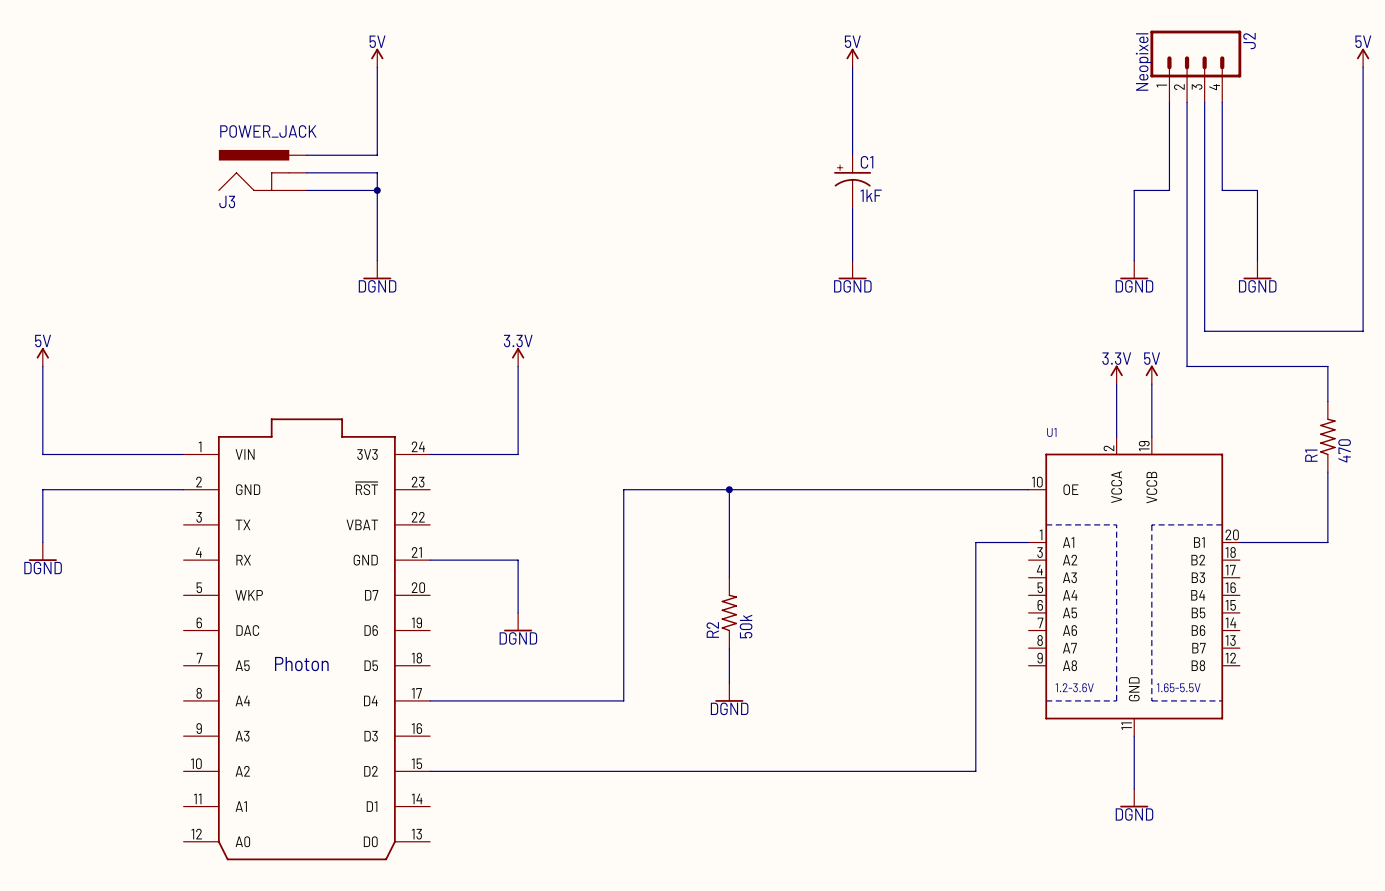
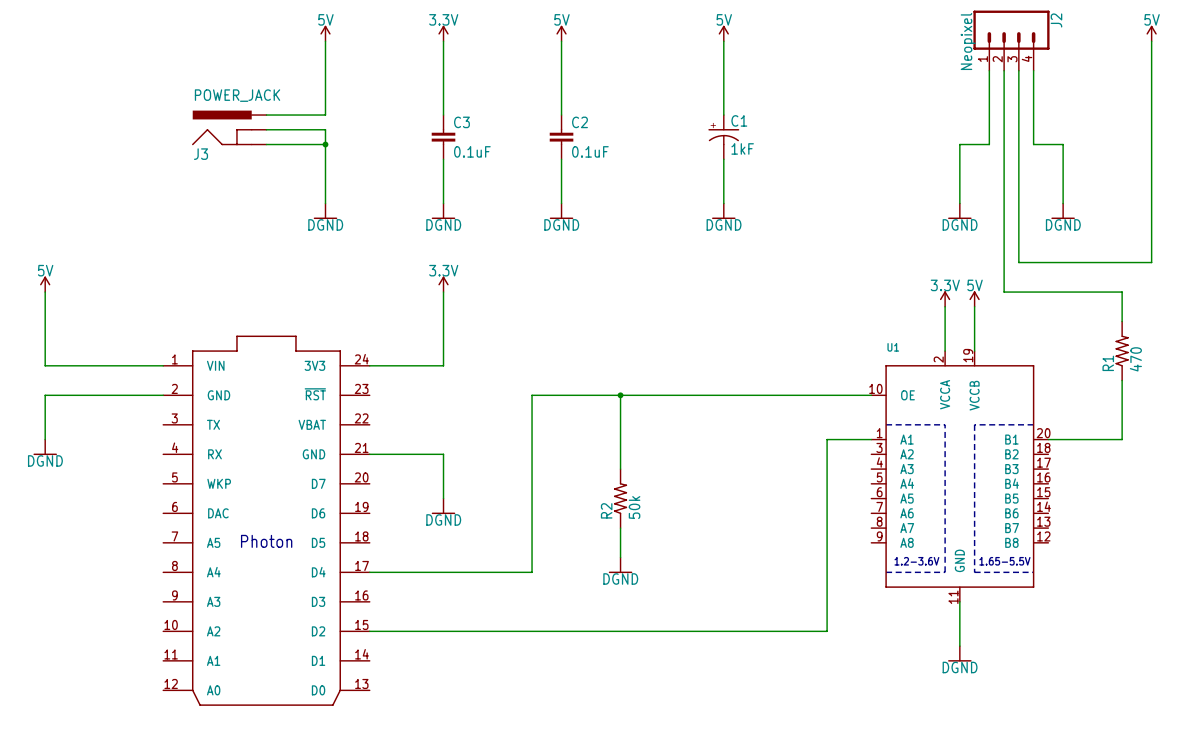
power symbol: none -> 3.3V (443, 33)
power symbol: none -> 5V (561, 33)
wire: none -> (443, 41) (443, 115)
wire: none -> (561, 41) (561, 115)
C3: none -> 0.1uF (443, 137)
C2: none -> 0.1uF (561, 137)
wire: none -> (443, 159) (443, 203)
wire: none -> (561, 159) (561, 203)
power symbol: none -> DGND (443, 211)
power symbol: none -> DGND (561, 211)

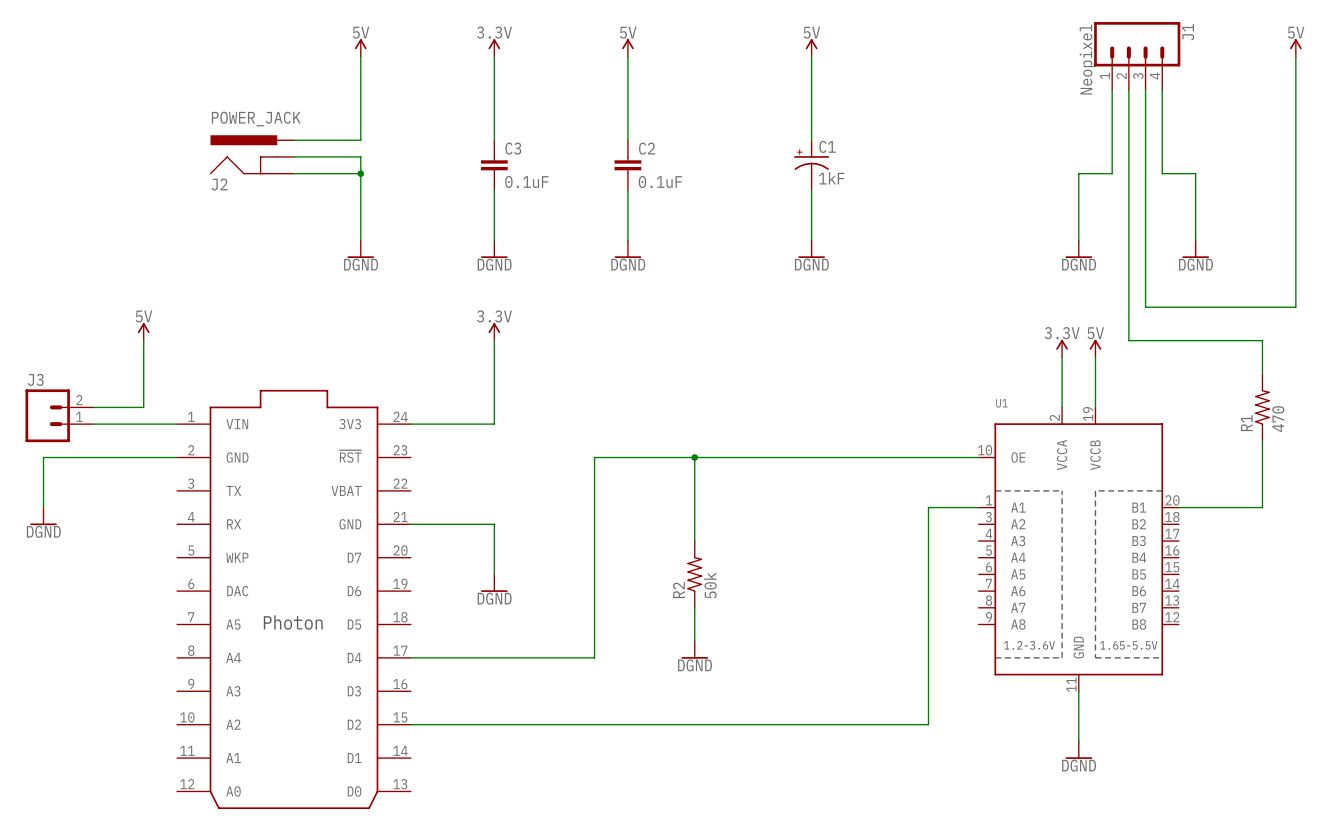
J2 name: J2 (1056, 20) -> J1 (1188, 32)
J3 name: J3 (201, 154) -> J2 (219, 184)
power symbol position: 5V (45, 284) -> 5V (143, 331)
wire: (45, 292) (45, 365) (89, 365) -> none
wire: none -> (143, 340) (143, 407) (93, 407)
J3: none -> (59, 415)

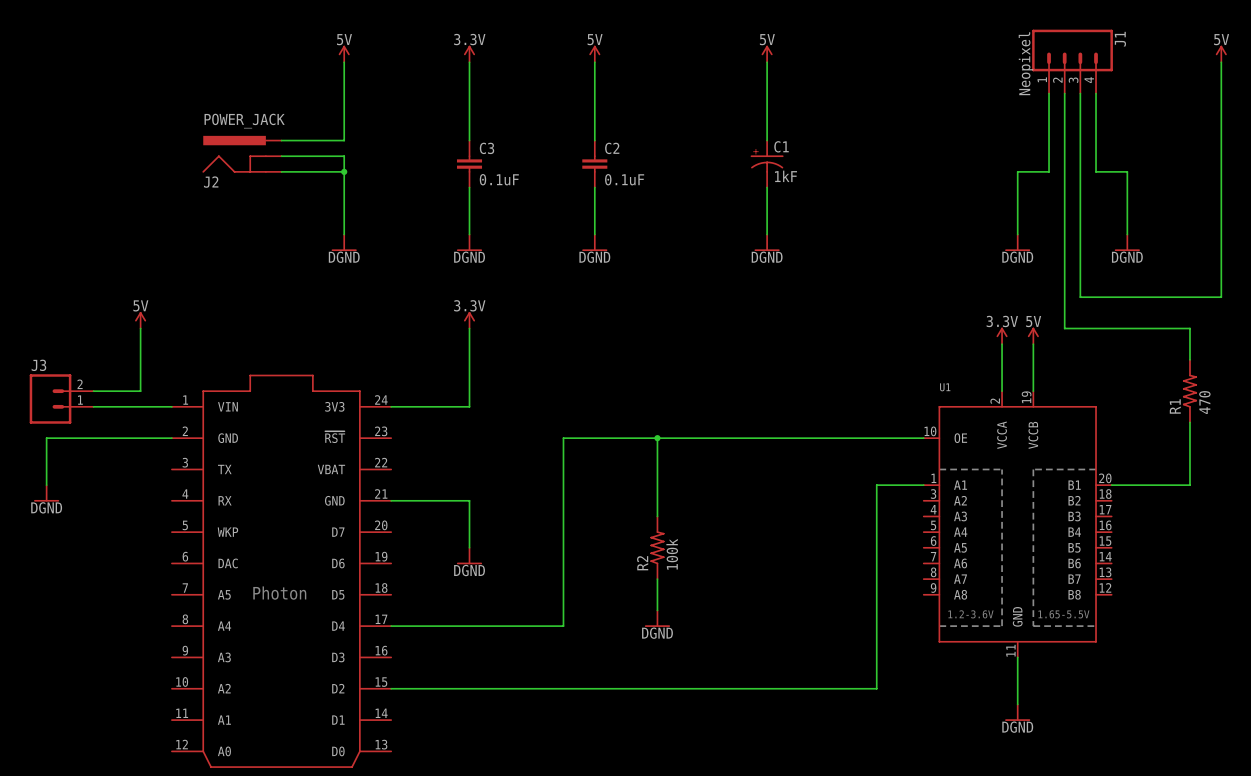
R2 value: 50k (710, 585) -> 100k (672, 554)

